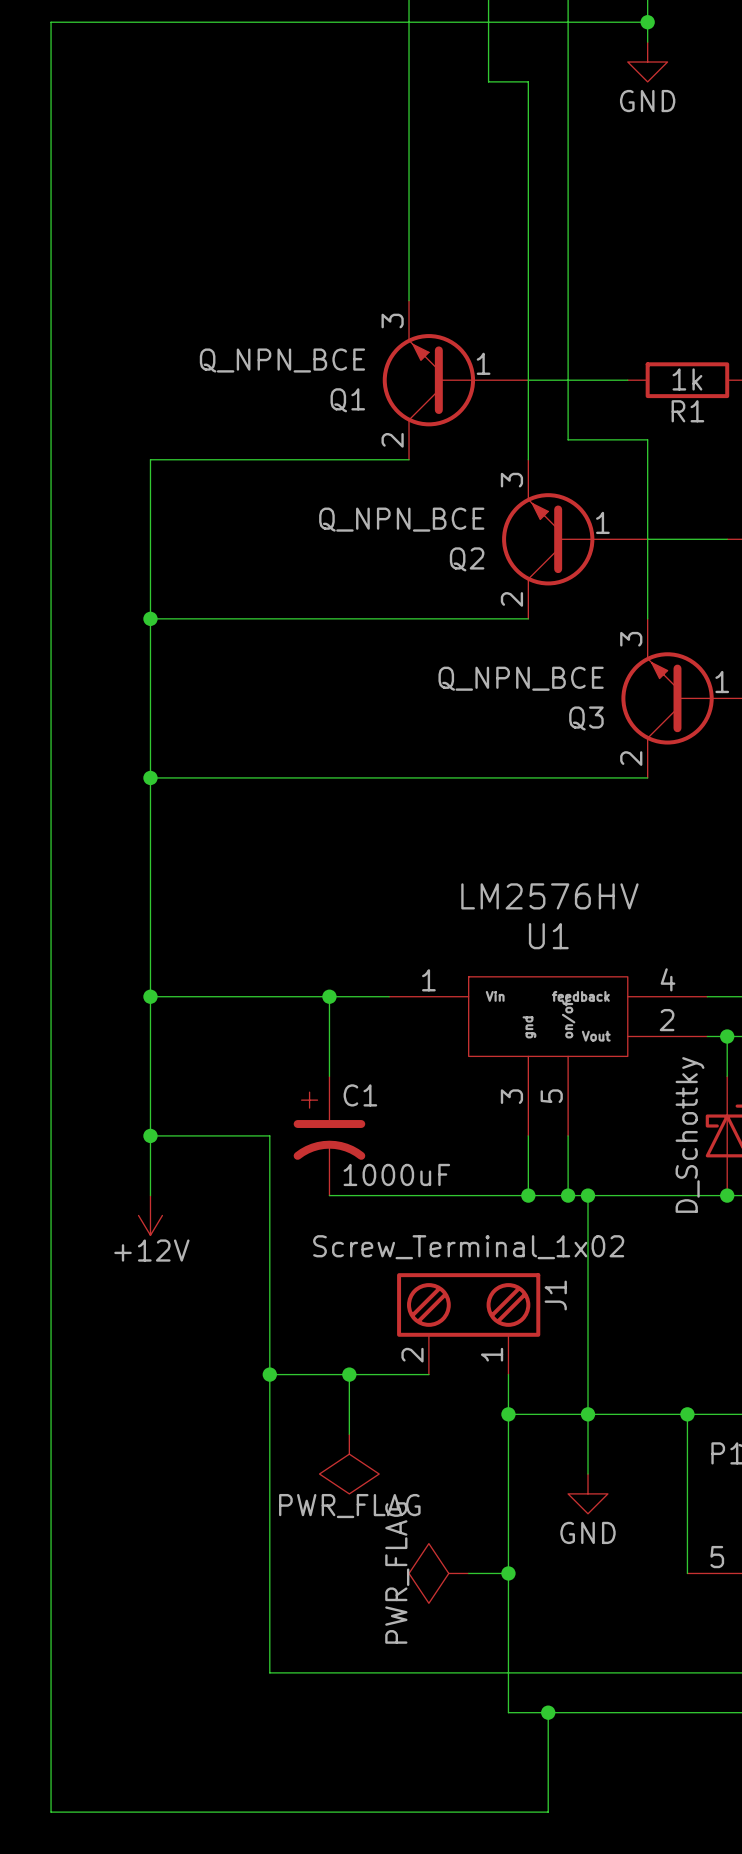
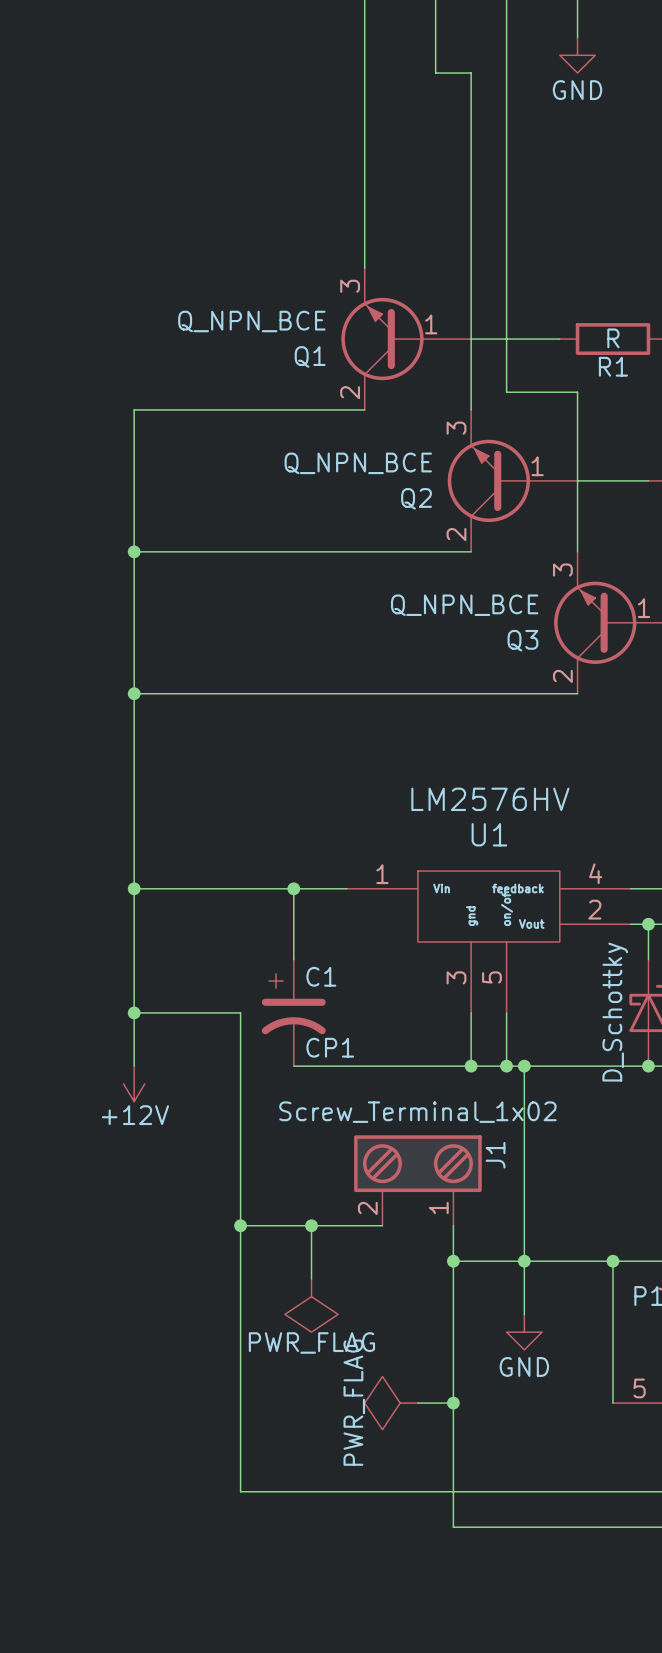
wire: (647, 22) (51, 22) (51, 1812) (548, 1812) (548, 1712) -> none
junction: (647, 22) -> none
R1 value: 1k (687, 379) -> R (613, 338)
C1 value: 1000uF (396, 1174) -> CP1 (330, 1047)
junction: (548, 1712) -> none

